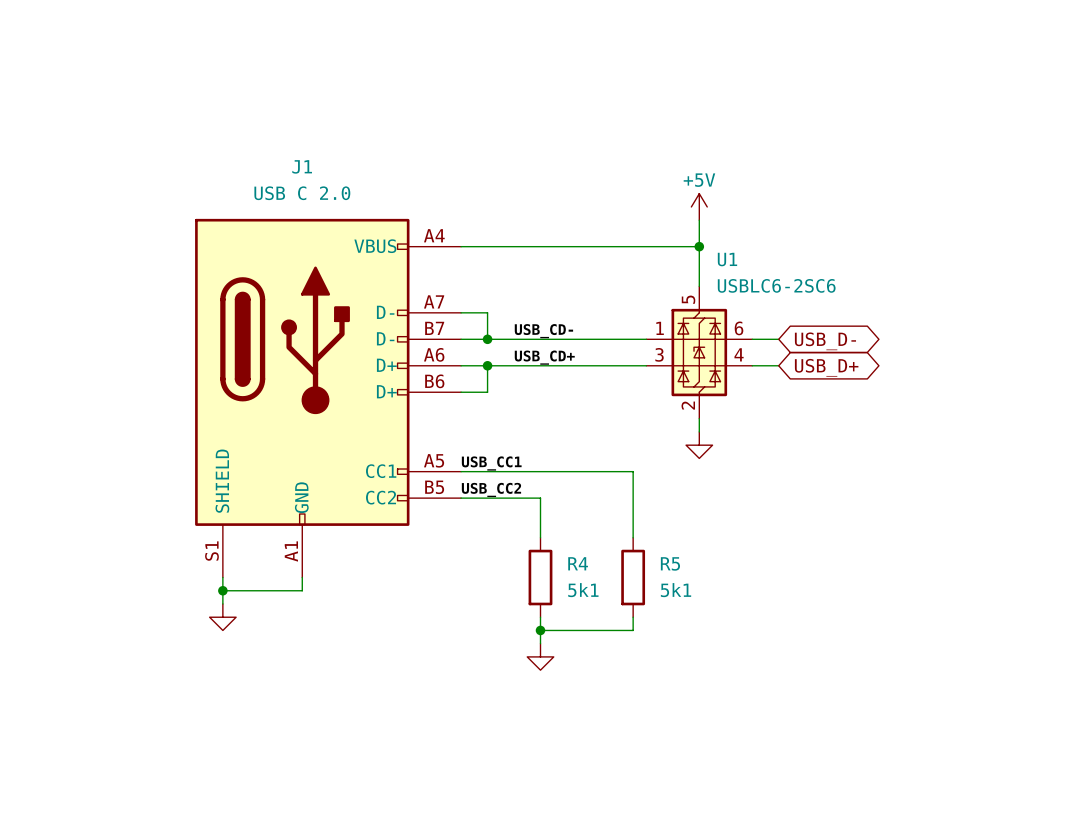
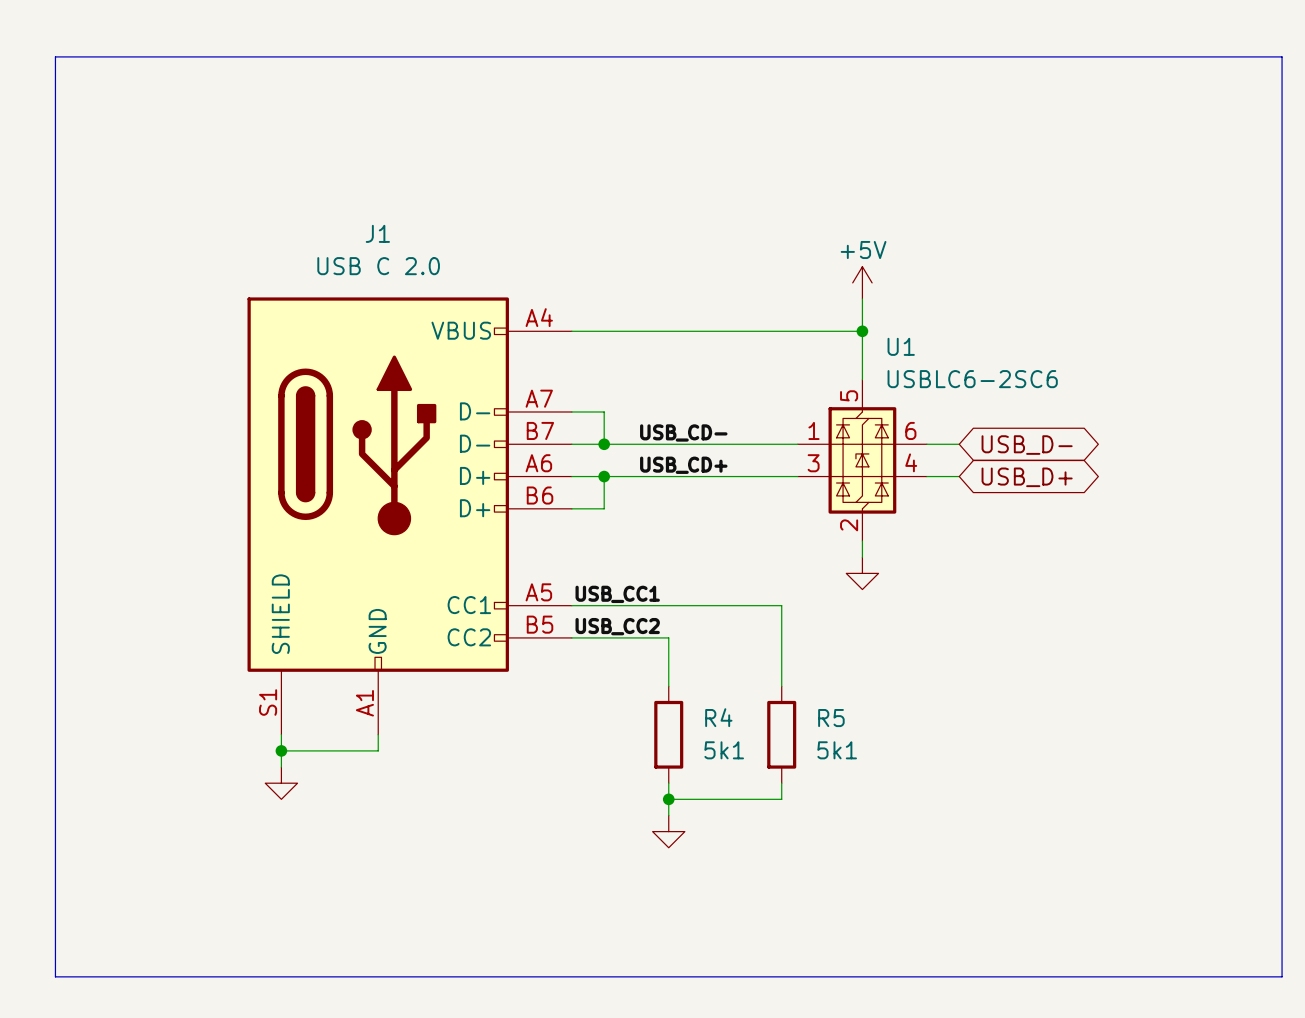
line: none -> (55, 56) (1282, 56) (1282, 976) (55, 976) (55, 56)

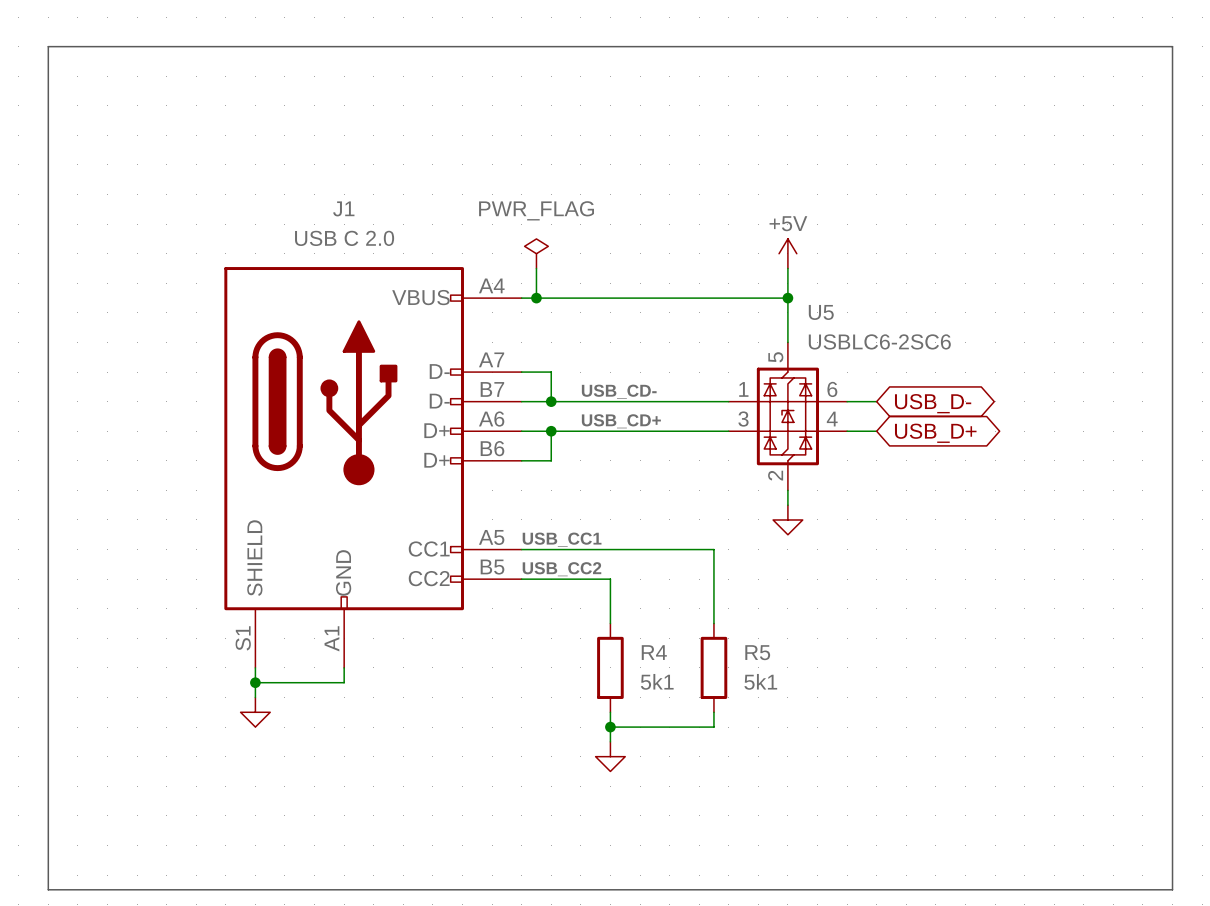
power symbol: none -> PWR_FLAG (536, 253)
wire: none -> (536, 268) (536, 298)
junction: none -> (536, 298)
U1 name: U1 (901, 346) -> U5 (821, 312)

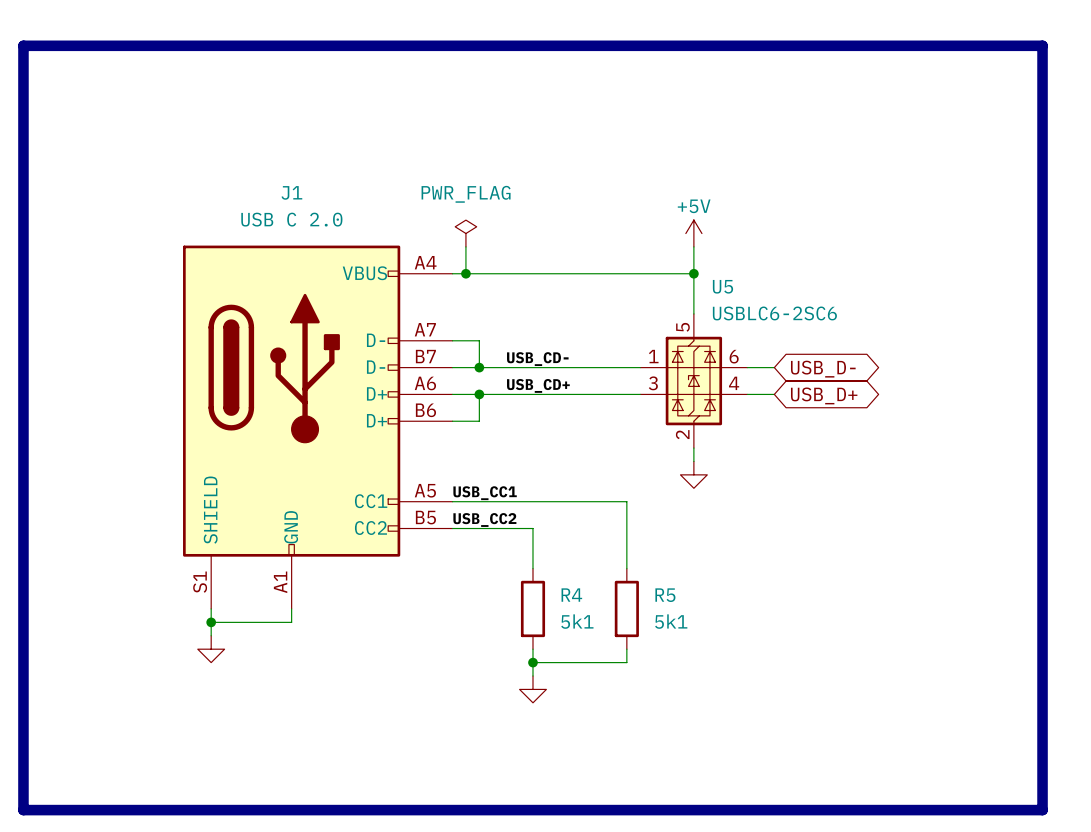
line width: thin (48, 46) (1172, 46) (1172, 889) (48, 889) (48, 46) -> thick (23, 45) (1042, 45) (1042, 810) (23, 810) (23, 45)

